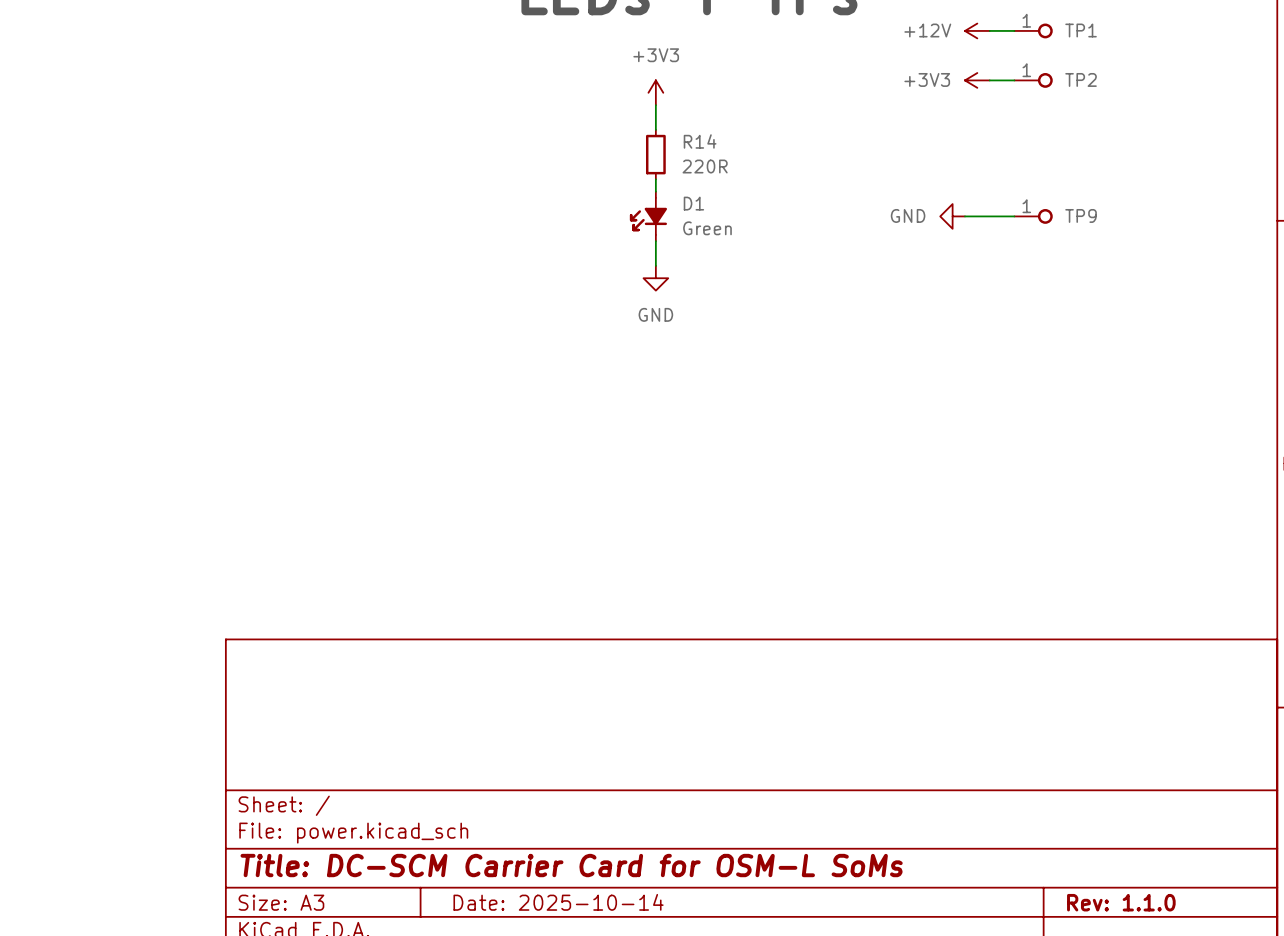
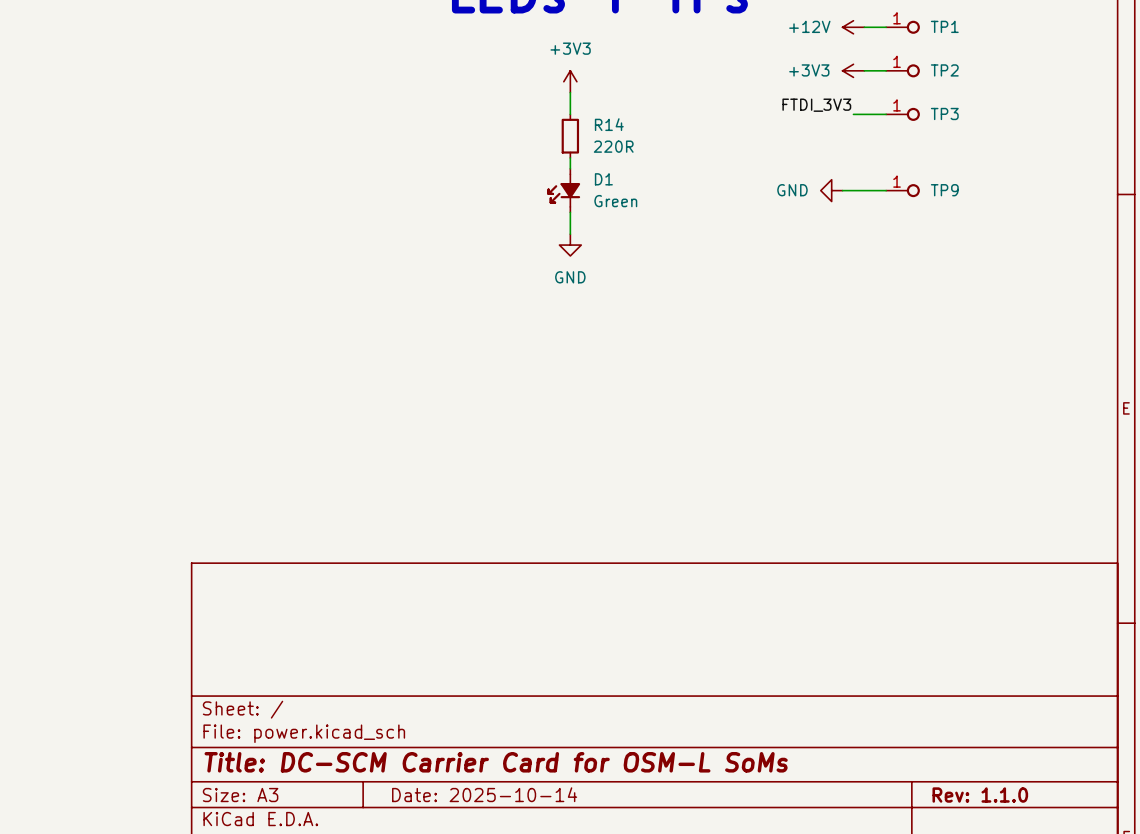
label: none -> FTDI_3V3 (816, 105)
wire: none -> (853, 114) (886, 114)
TP3: none -> (903, 114)

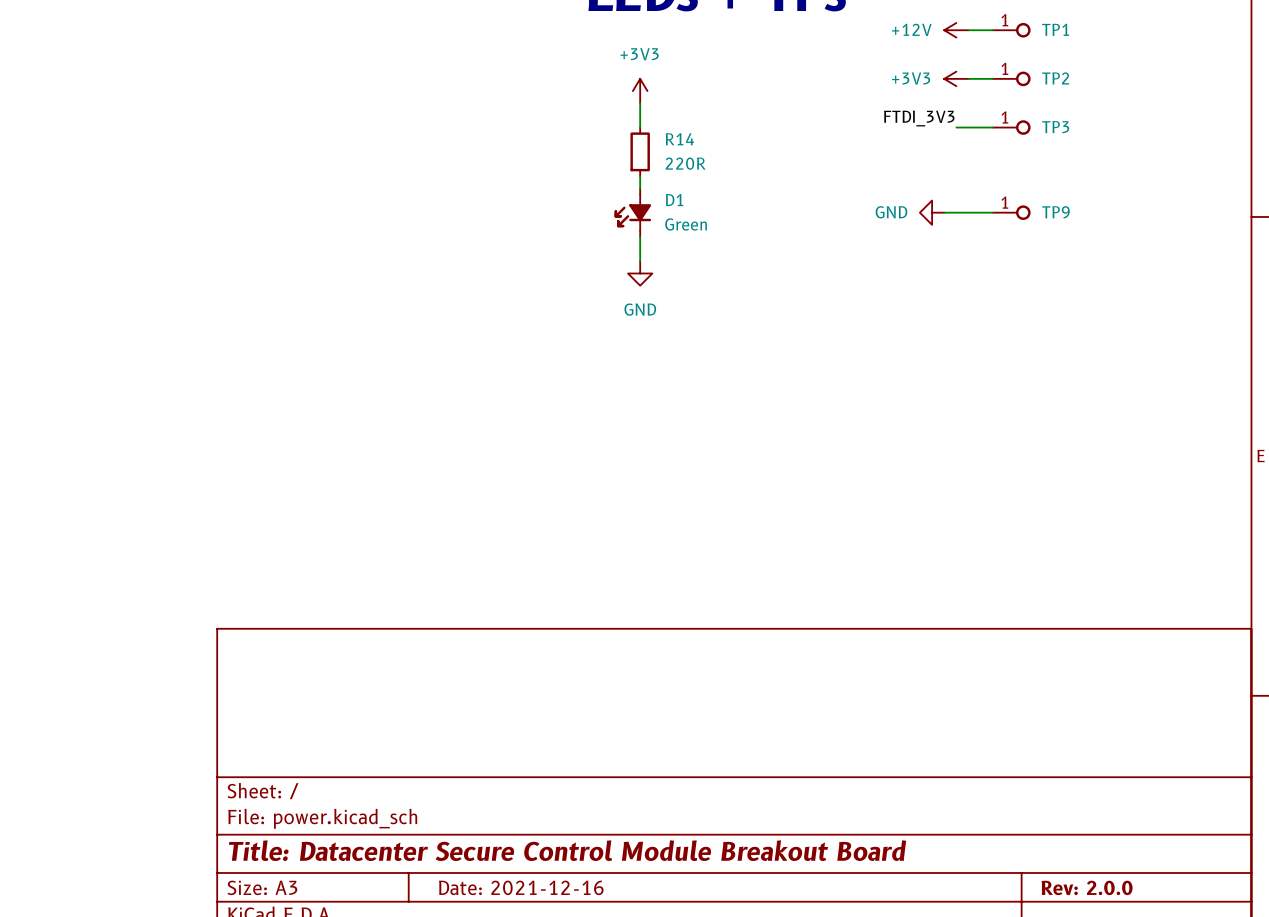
title block: Title: DC-SCM Carrier Card for OSM-L SoMs (496, 762) -> Title: Datacenter Secure Control Module Breakout Board (567, 850)
title block: Date: 2025-10-14 (484, 794) -> Date: 2021-12-16 (521, 887)
title block: Rev: 1.1.0 (980, 795) -> Rev: 2.0.0 (1087, 887)

